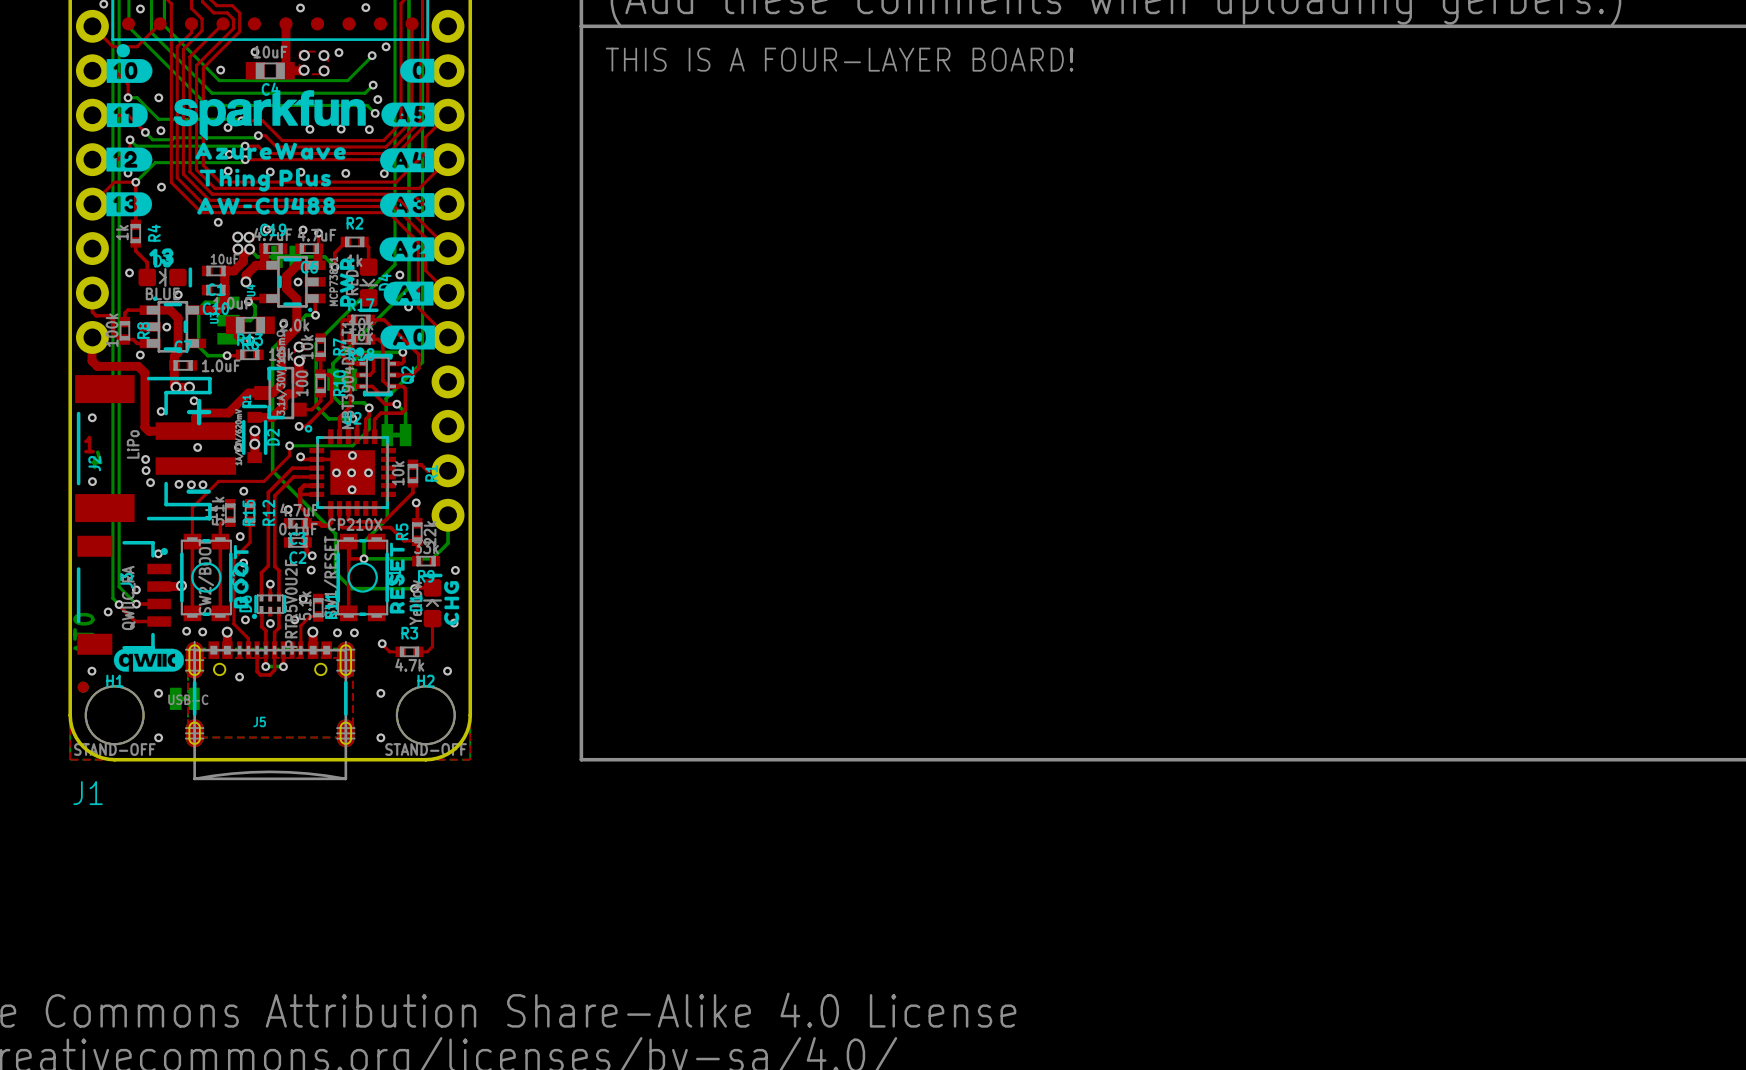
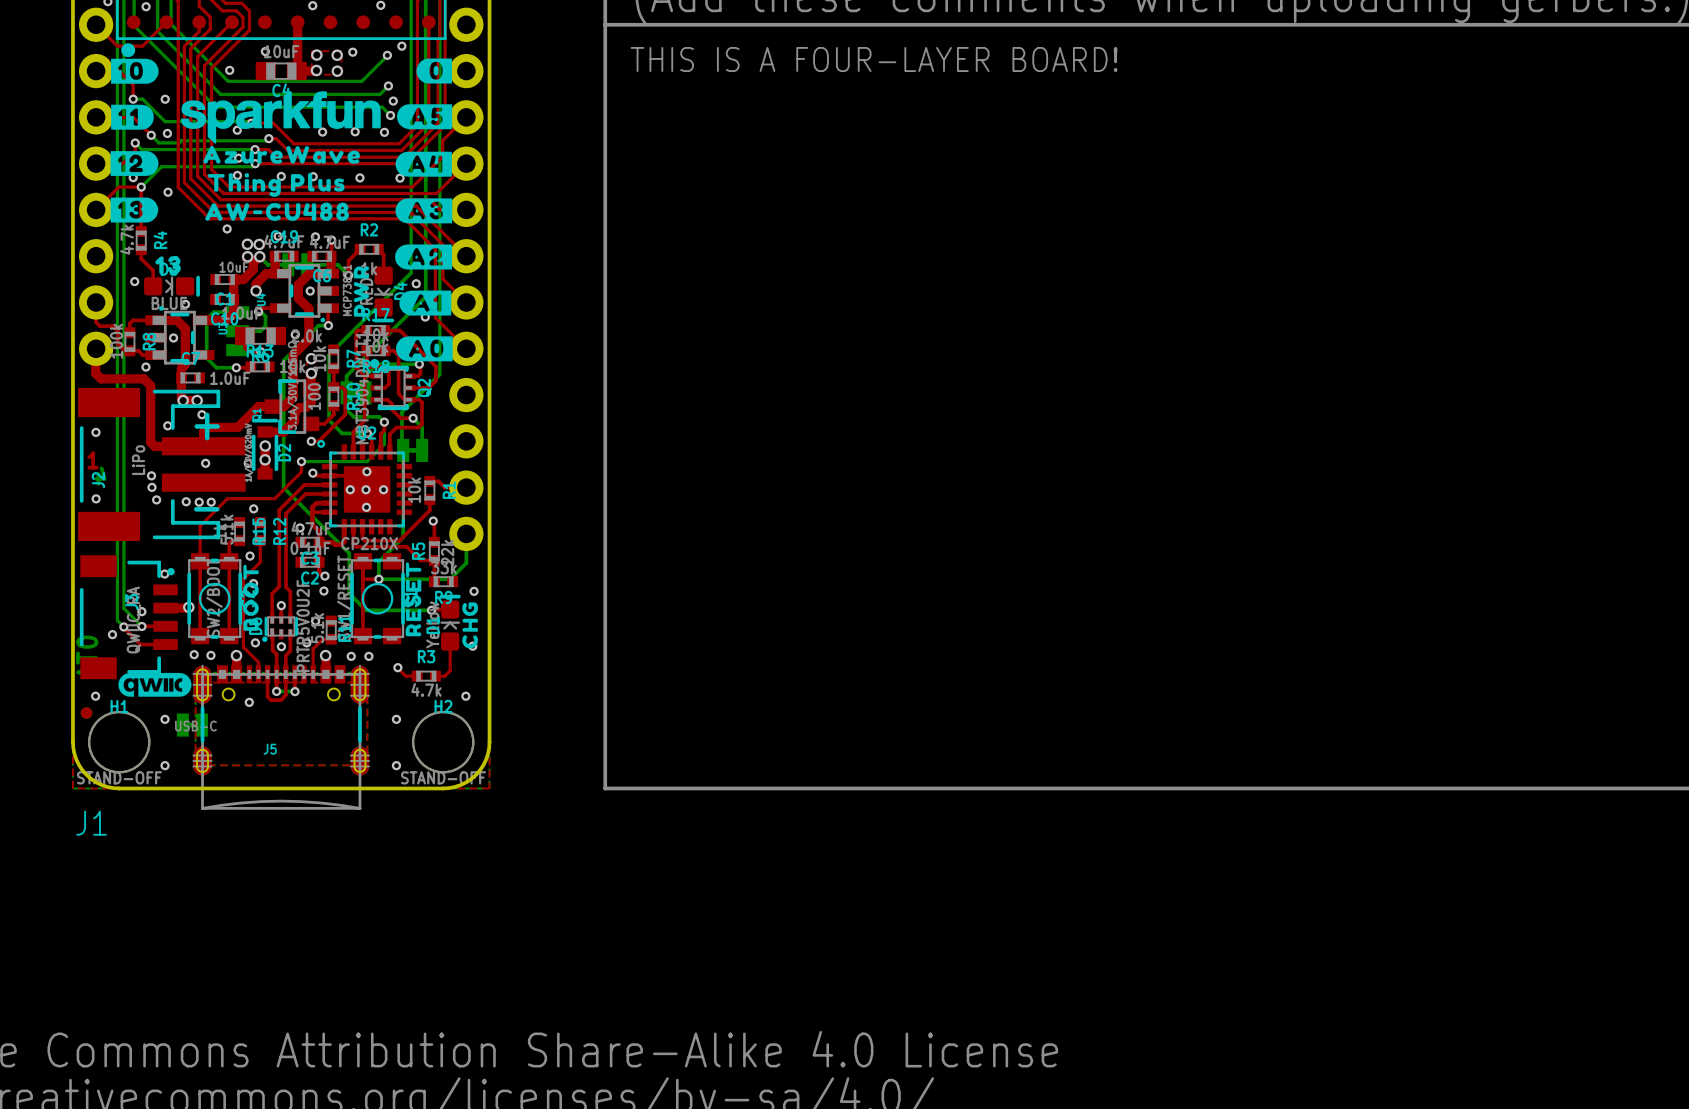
R4 value: 1k (122, 232) -> 4.7k (126, 239)

